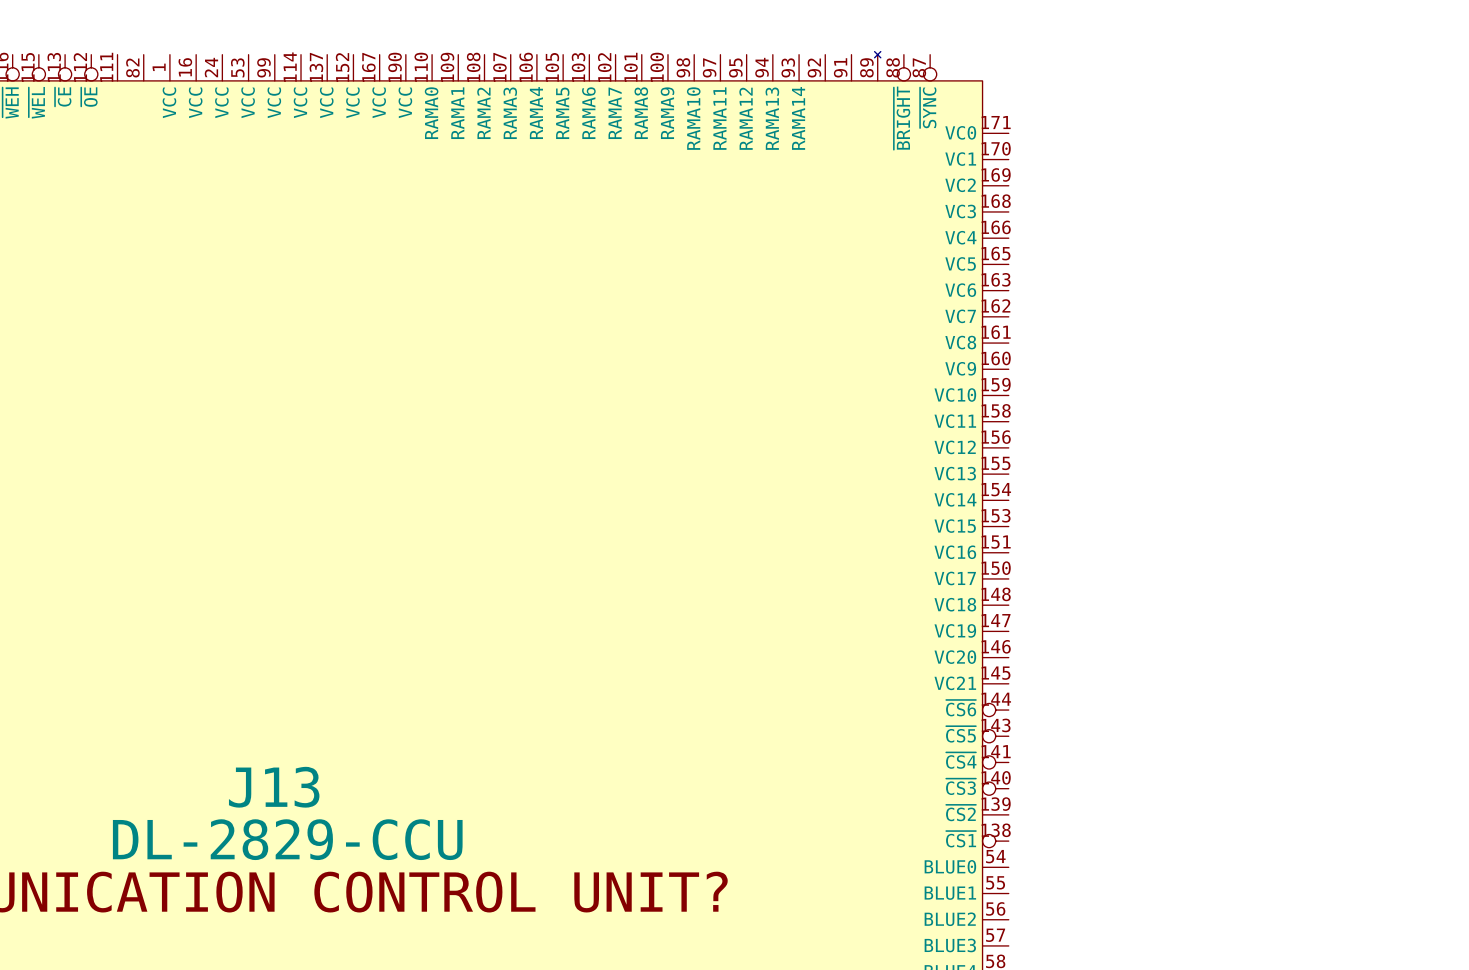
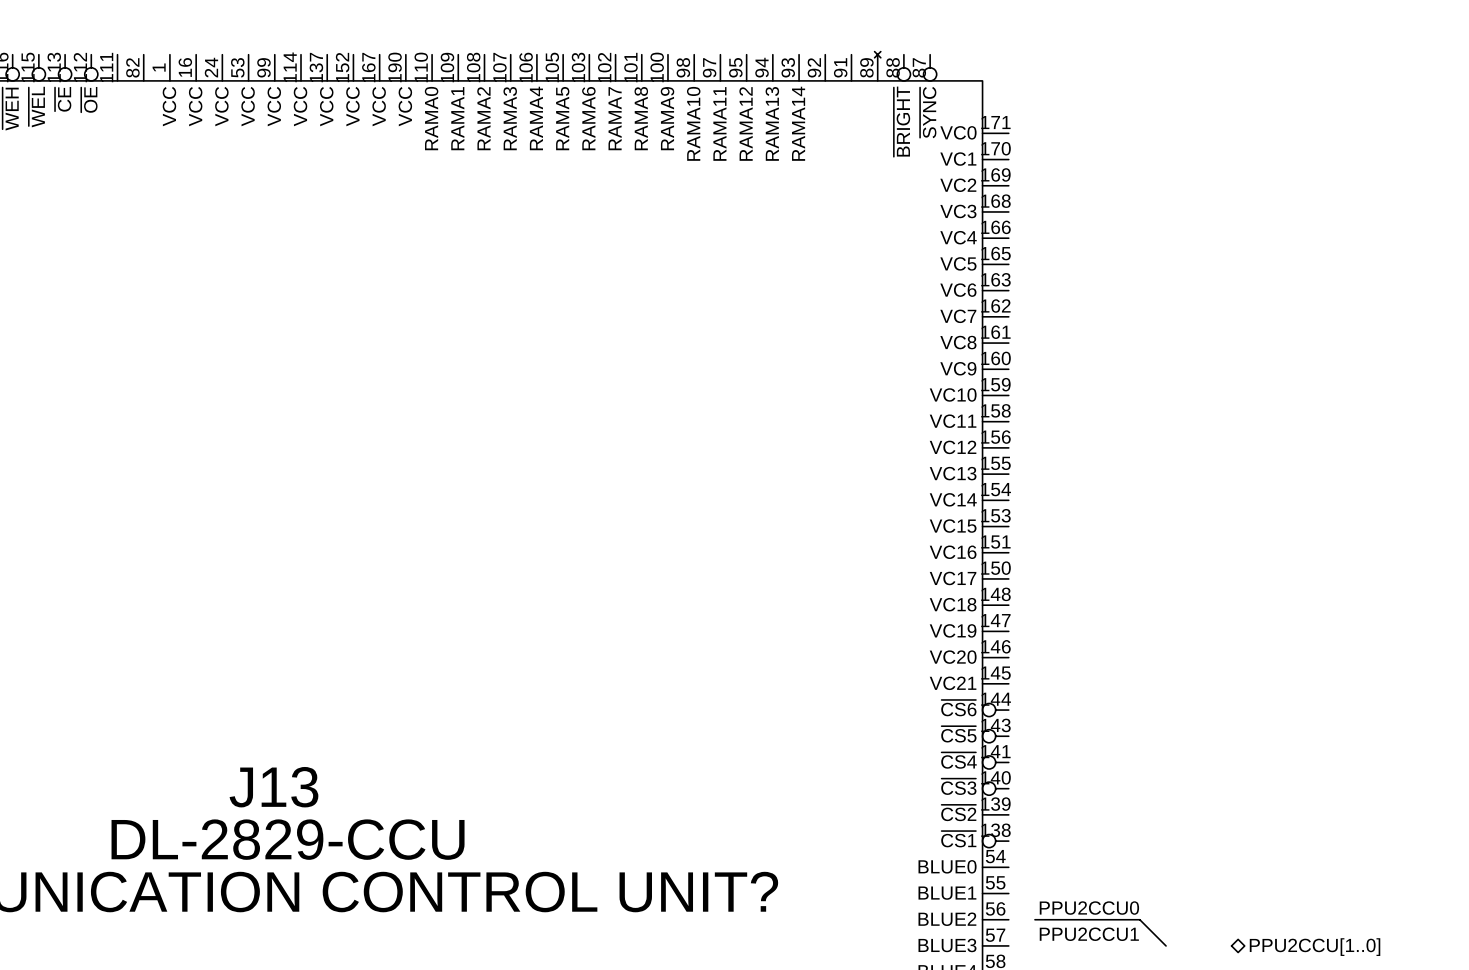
label: none -> PPU2CCU0 (1089, 908)
wire: none -> (1034, 919) (1139, 919) (1166, 945)
label: none -> PPU2CCU1 (1089, 934)
hierarchical label: none -> PPU2CCU[1..0] (1315, 947)

